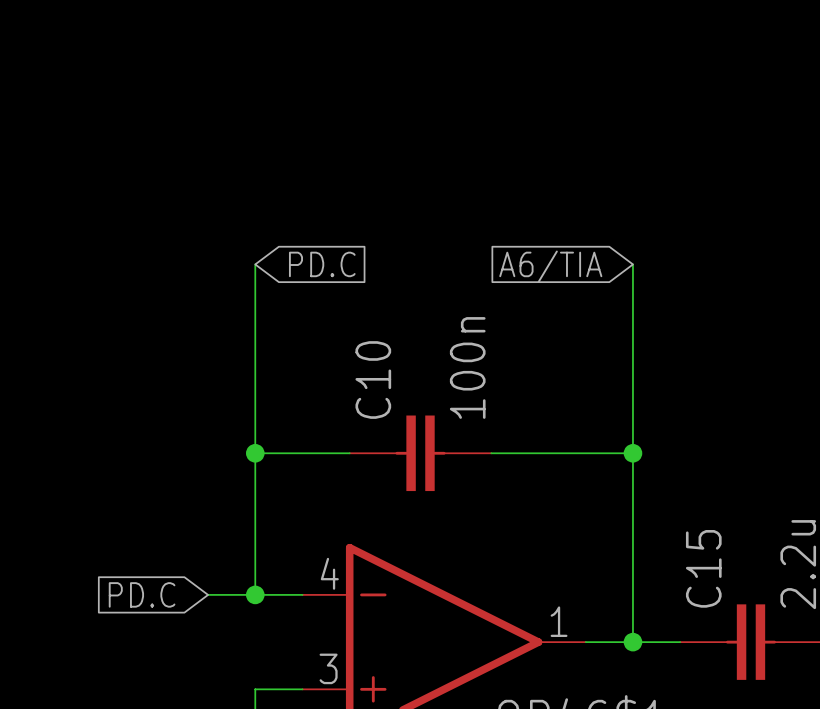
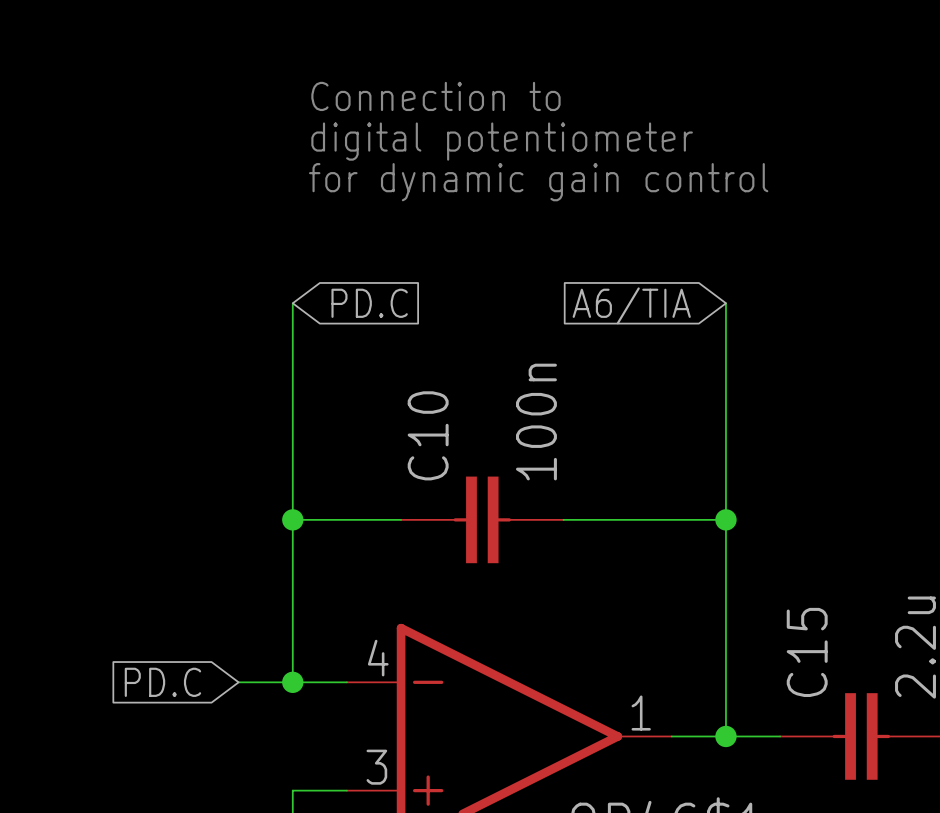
text: none -> Connection to (435, 96)
text: none -> digital potentiometer (502, 141)
text: none -> for dynamic gain control (538, 182)

